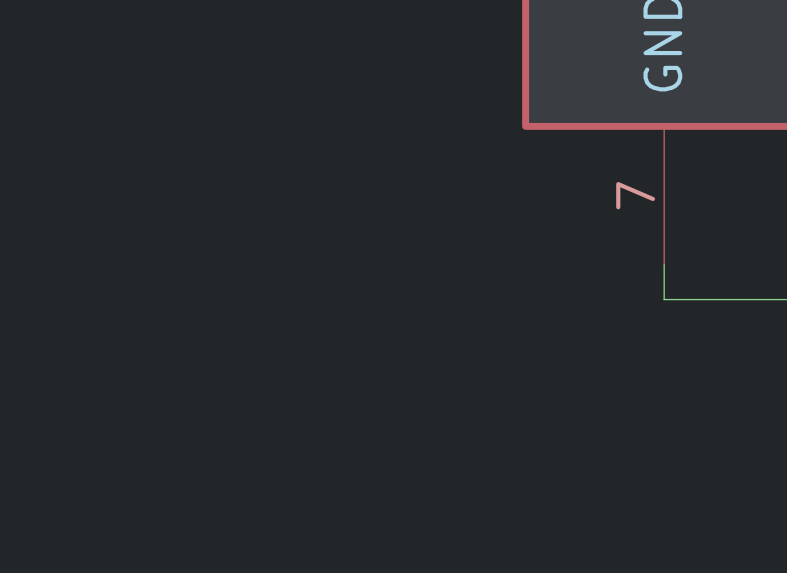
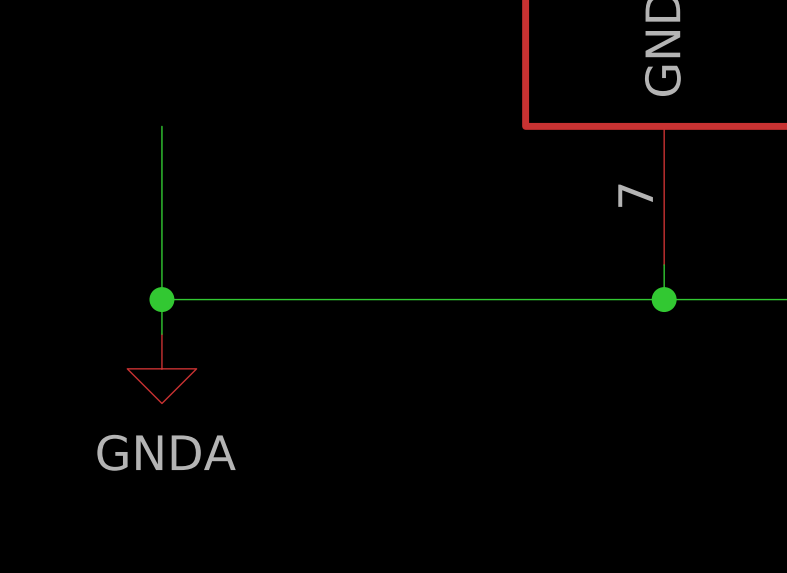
wire: none -> (161, 126) (161, 334)
wire: none -> (161, 299) (664, 299)
junction: none -> (161, 299)
junction: none -> (664, 299)
power symbol: none -> GNDA (161, 368)

